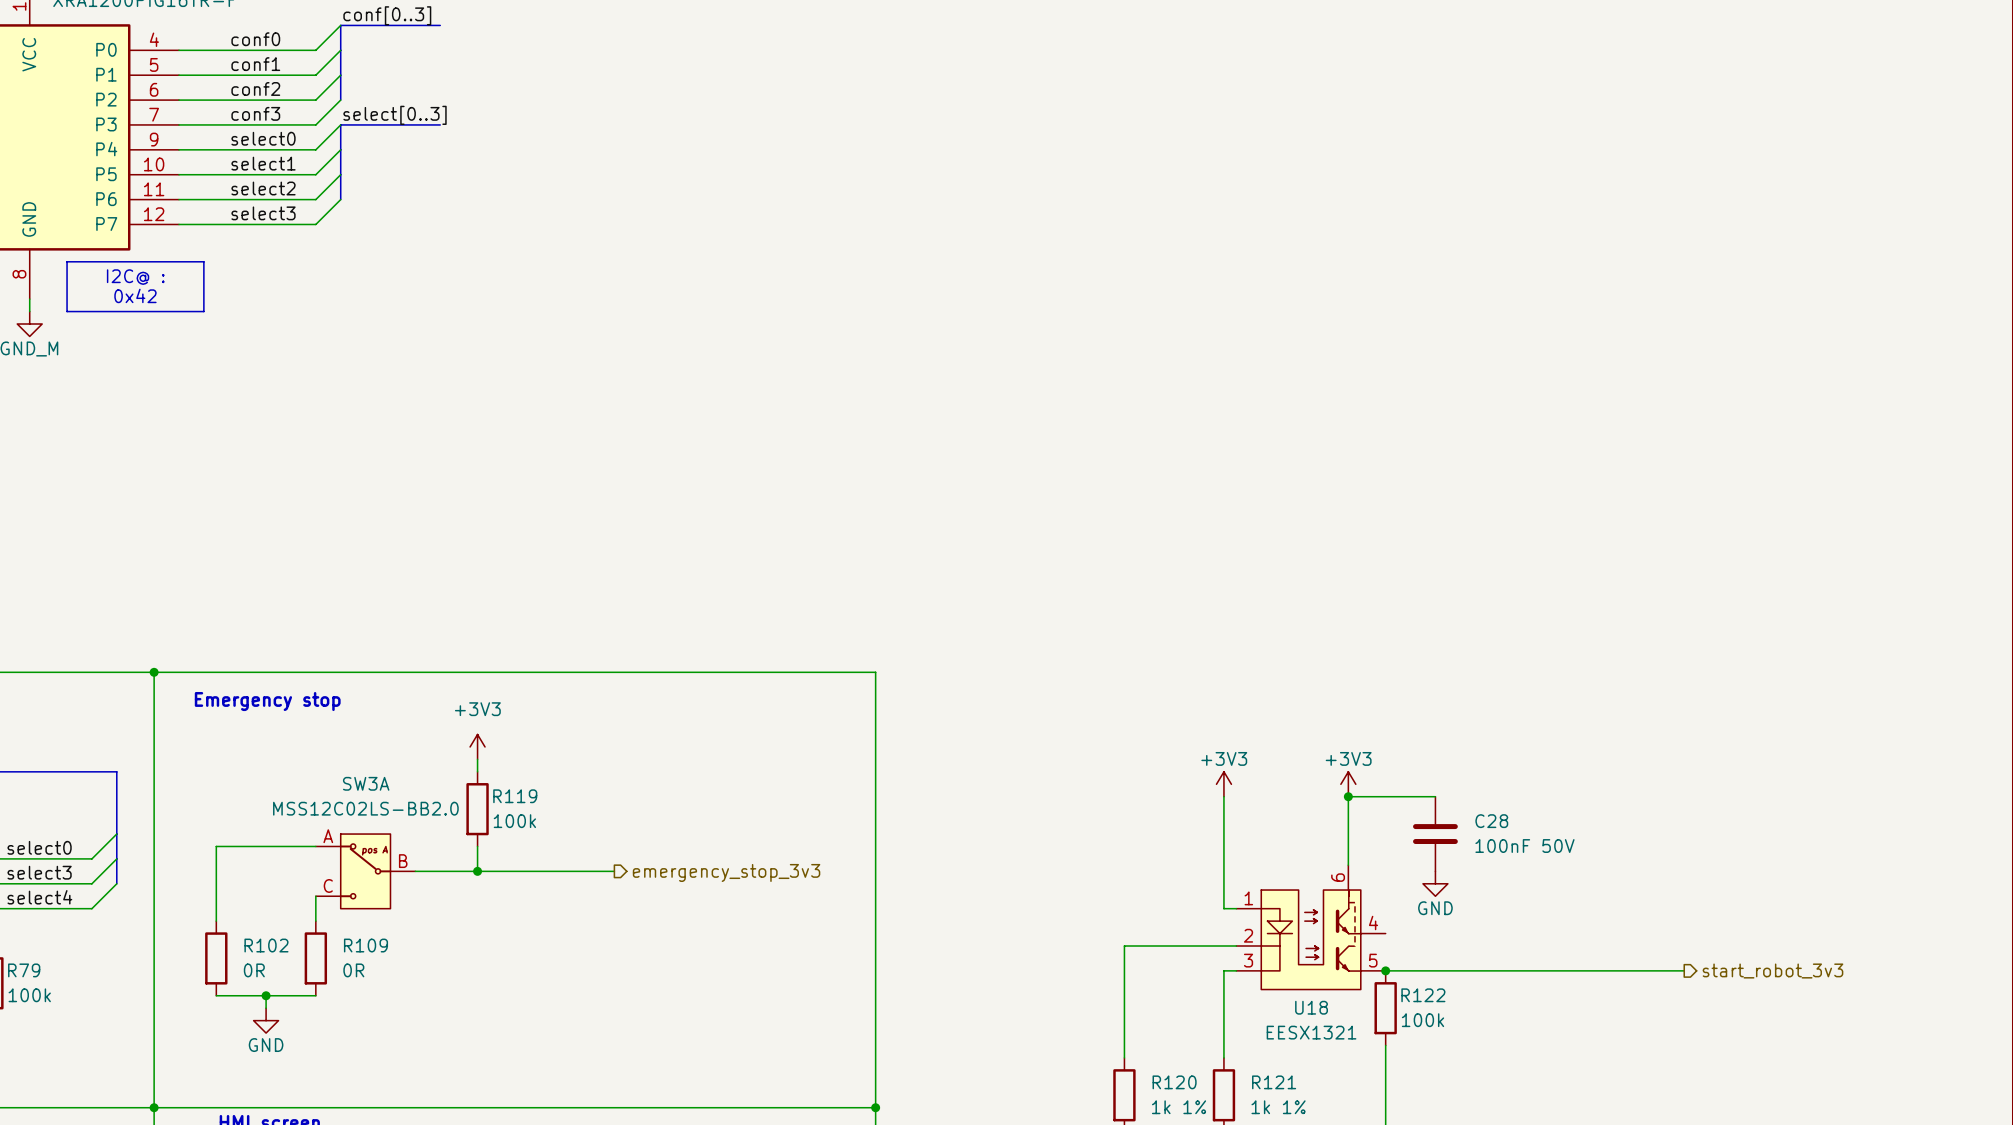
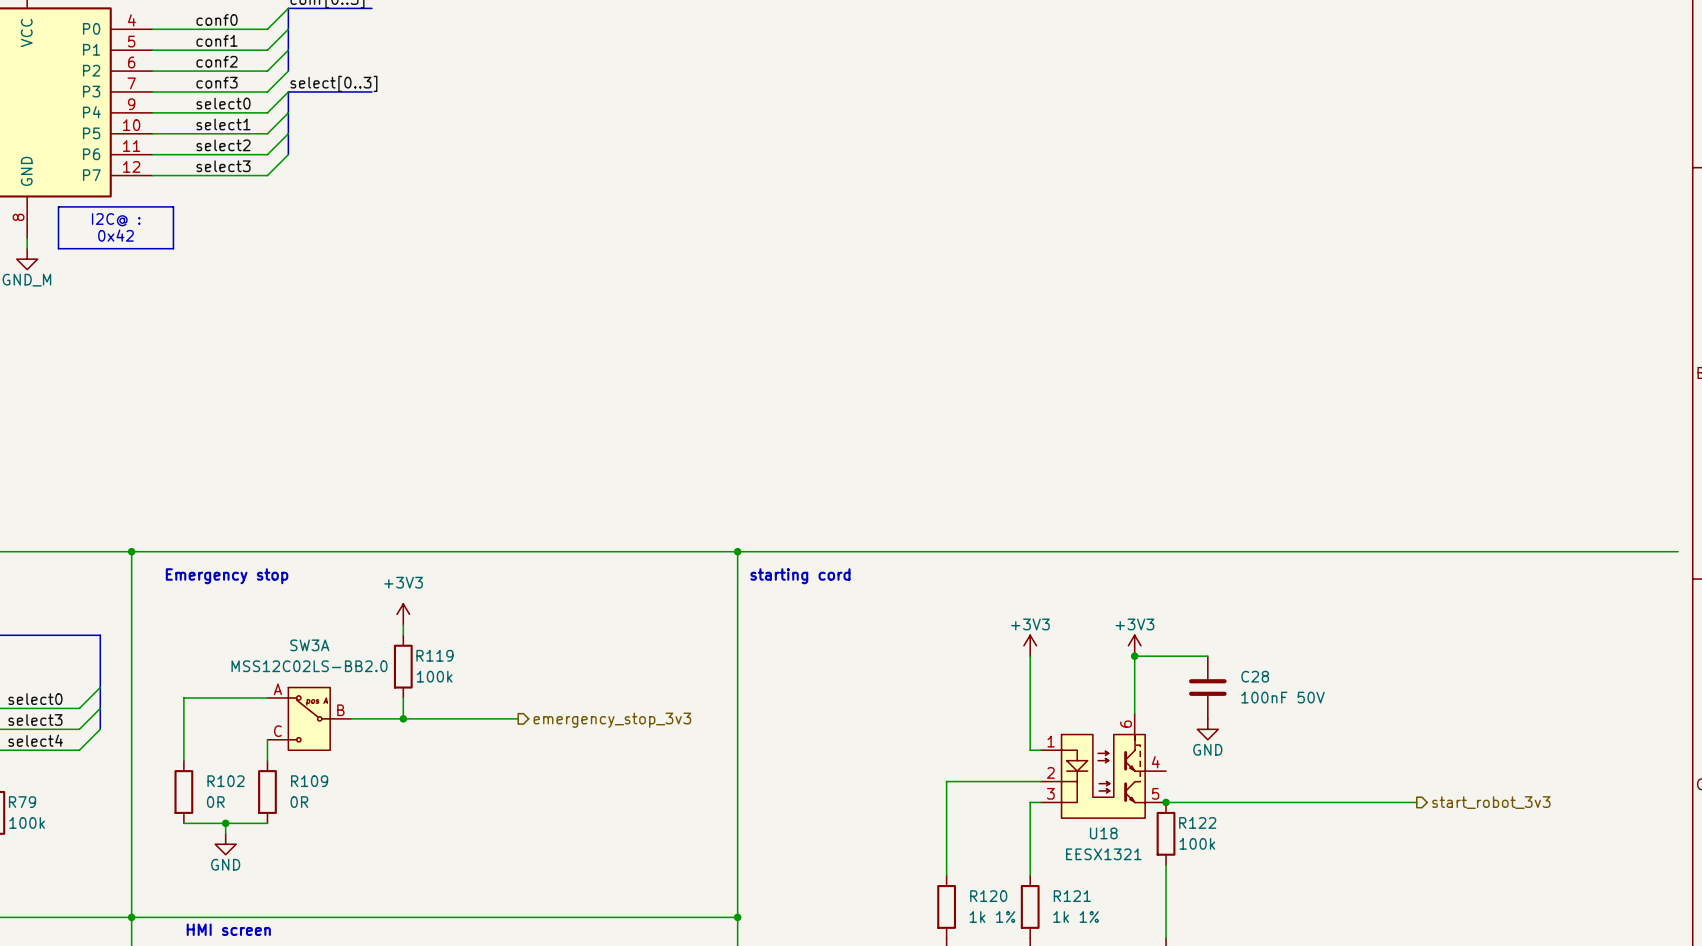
wire: none -> (737, 551) (1678, 551)
junction: none -> (737, 551)
text: none -> starting cord (800, 576)

